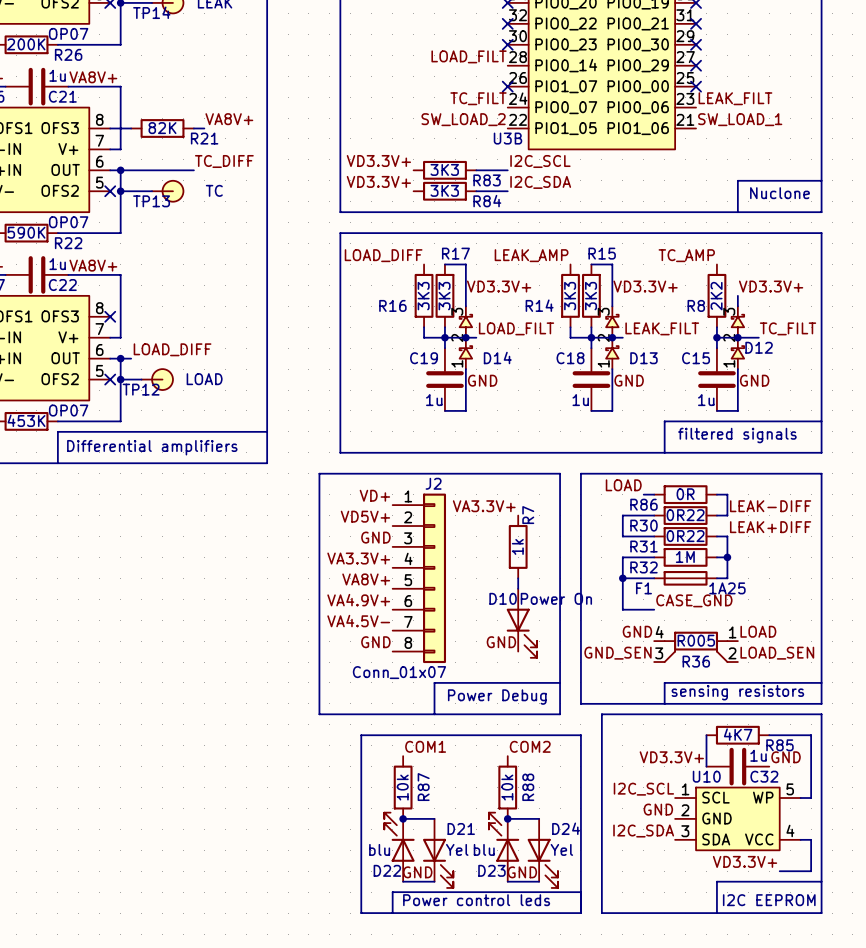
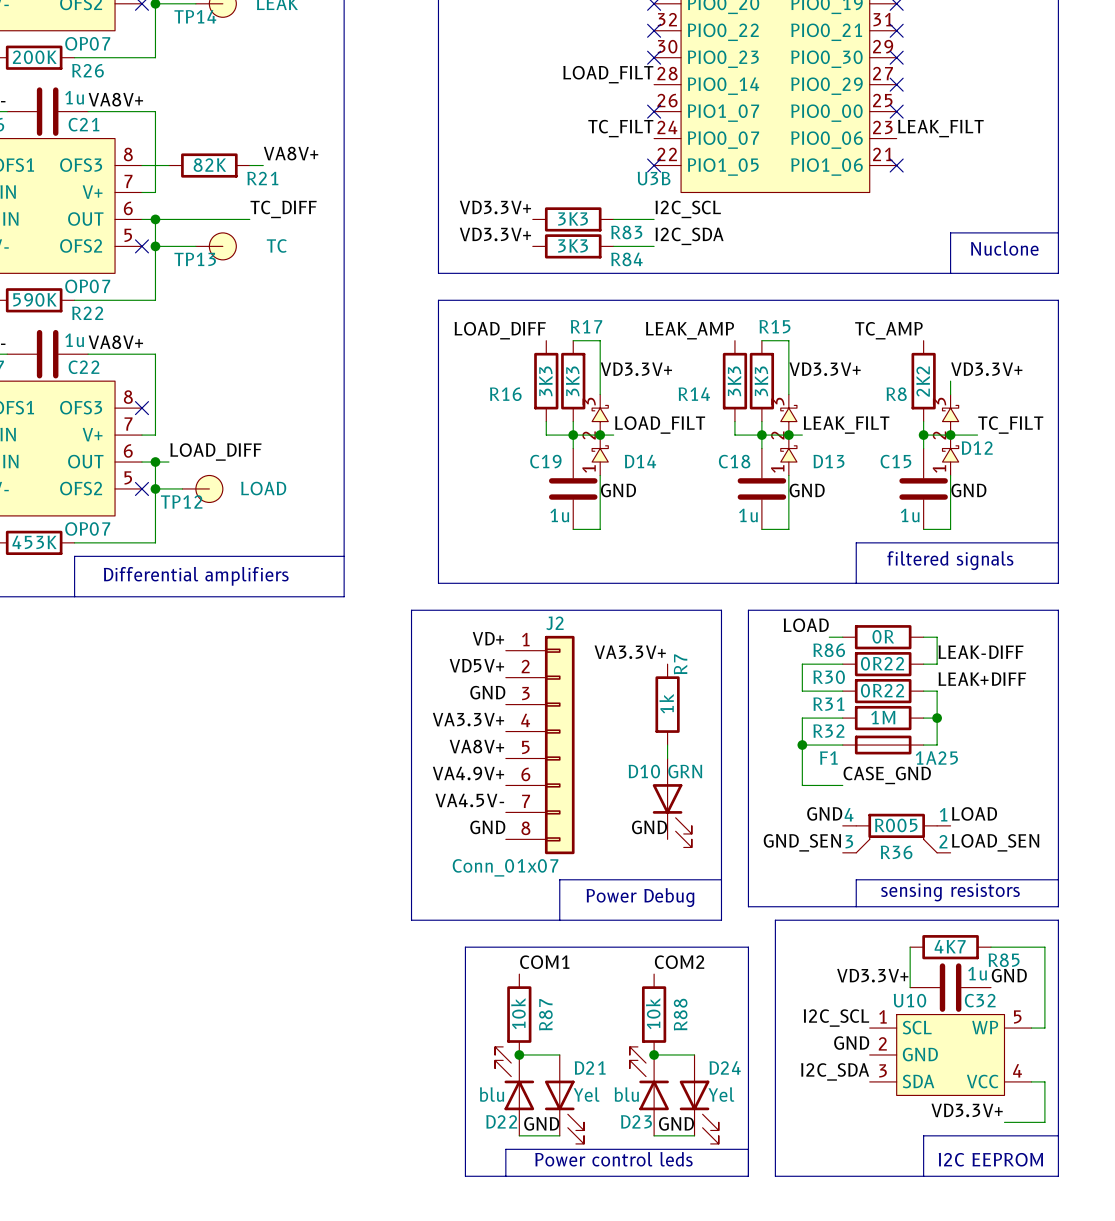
label: SW_LOAD_2 (463, 119) -> none
label: SW_LOAD_1 (740, 119) -> none
no-connect mark: none -> (654, 165)
no-connect mark: none -> (896, 165)
D10 value: Power On (556, 598) -> GRN (685, 771)

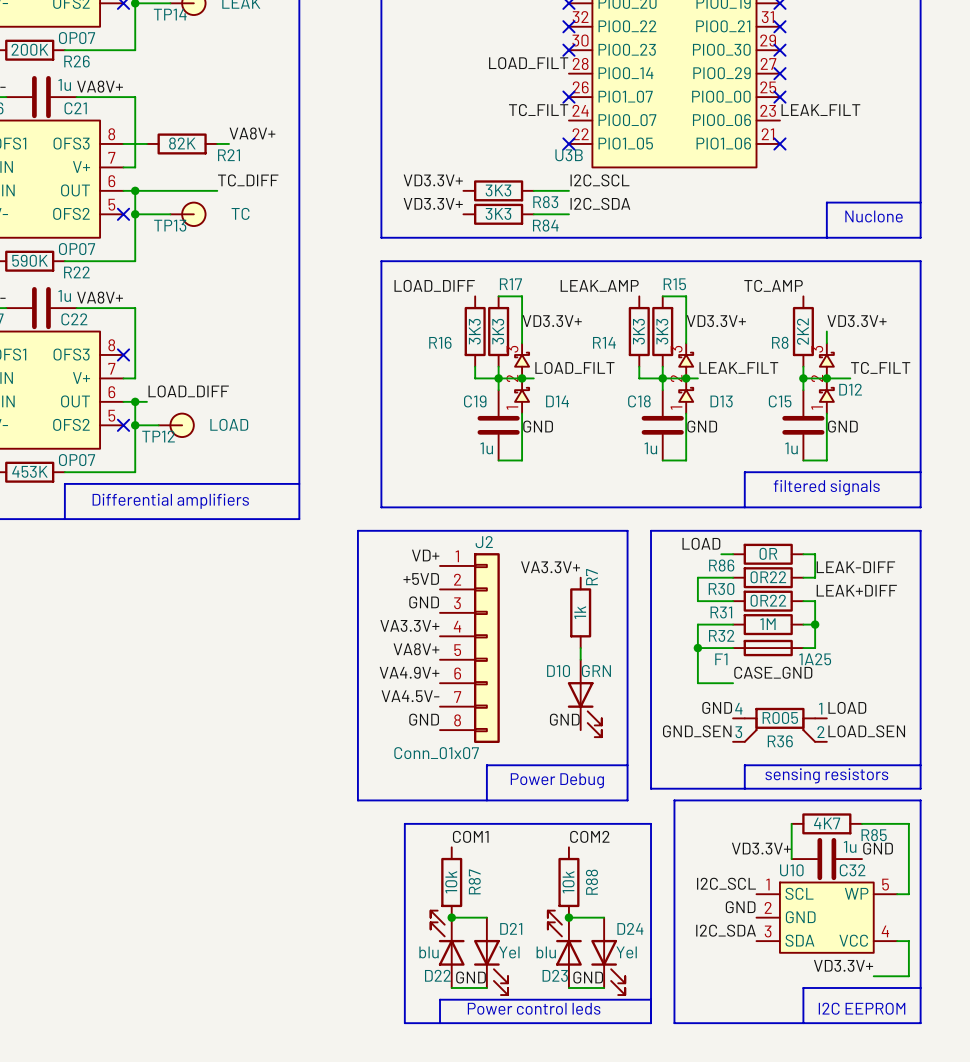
label: VD5V+ (476, 665) -> +5VD (421, 579)

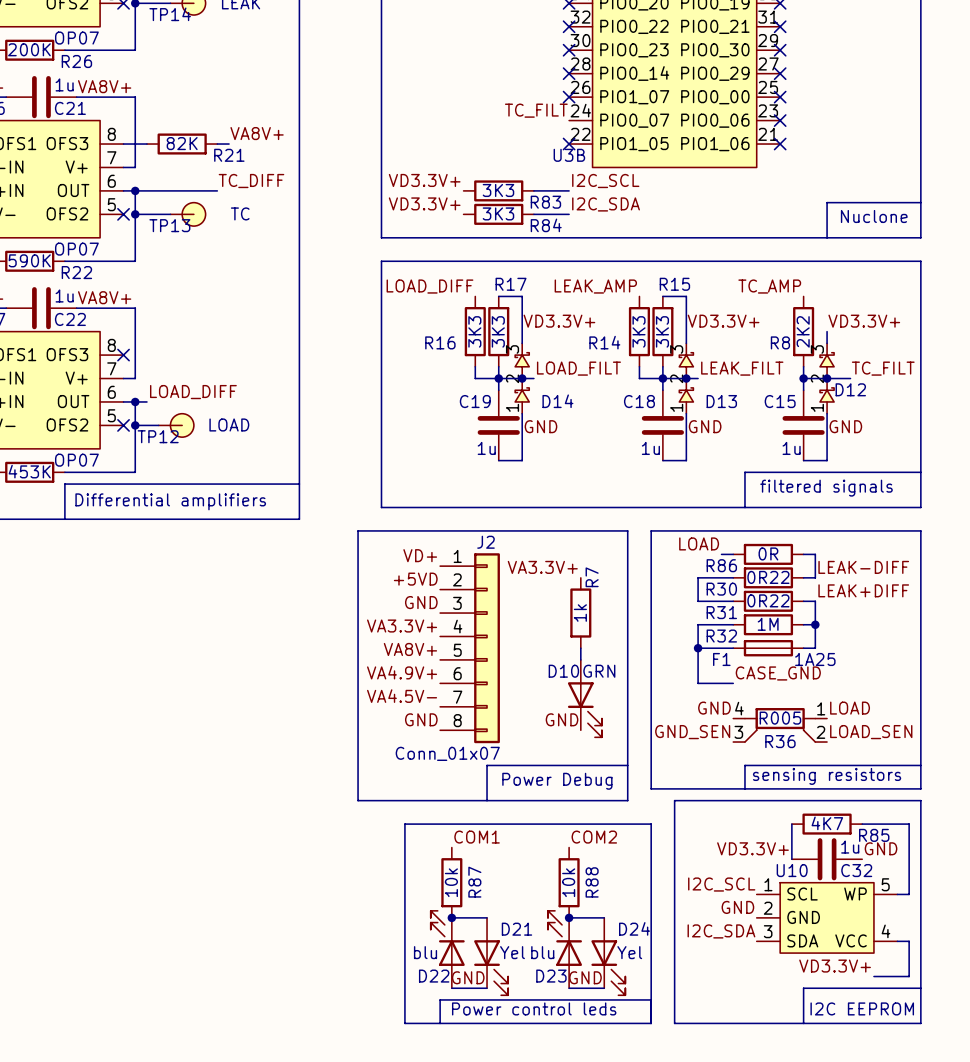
label: LOAD_FILT (528, 63) -> none
no-connect mark: none -> (569, 73)
label: LEAK_FILT (820, 110) -> none
no-connect mark: none -> (780, 120)

